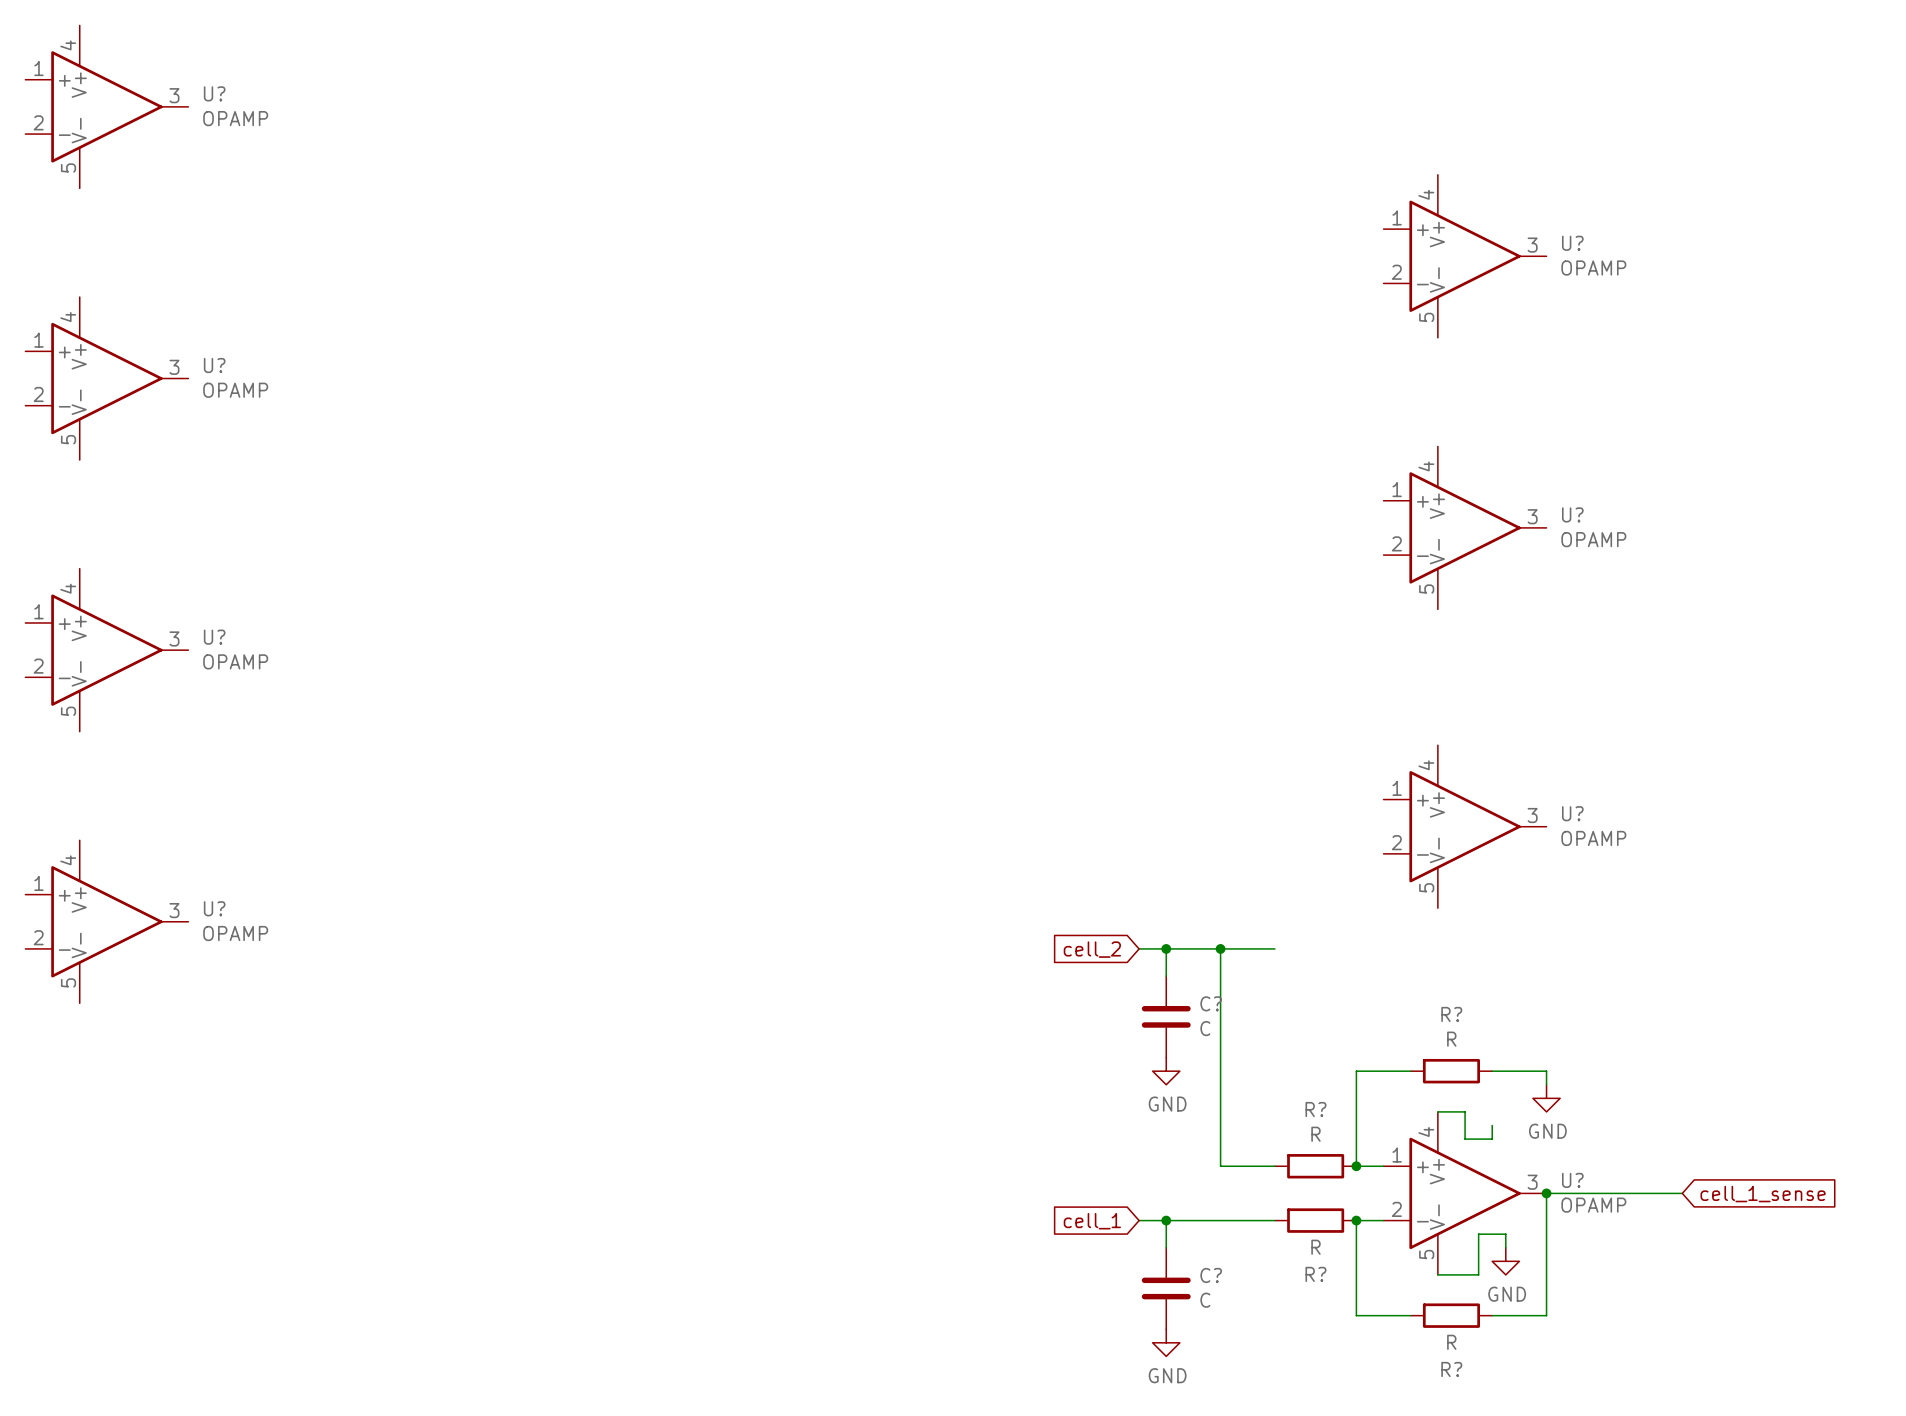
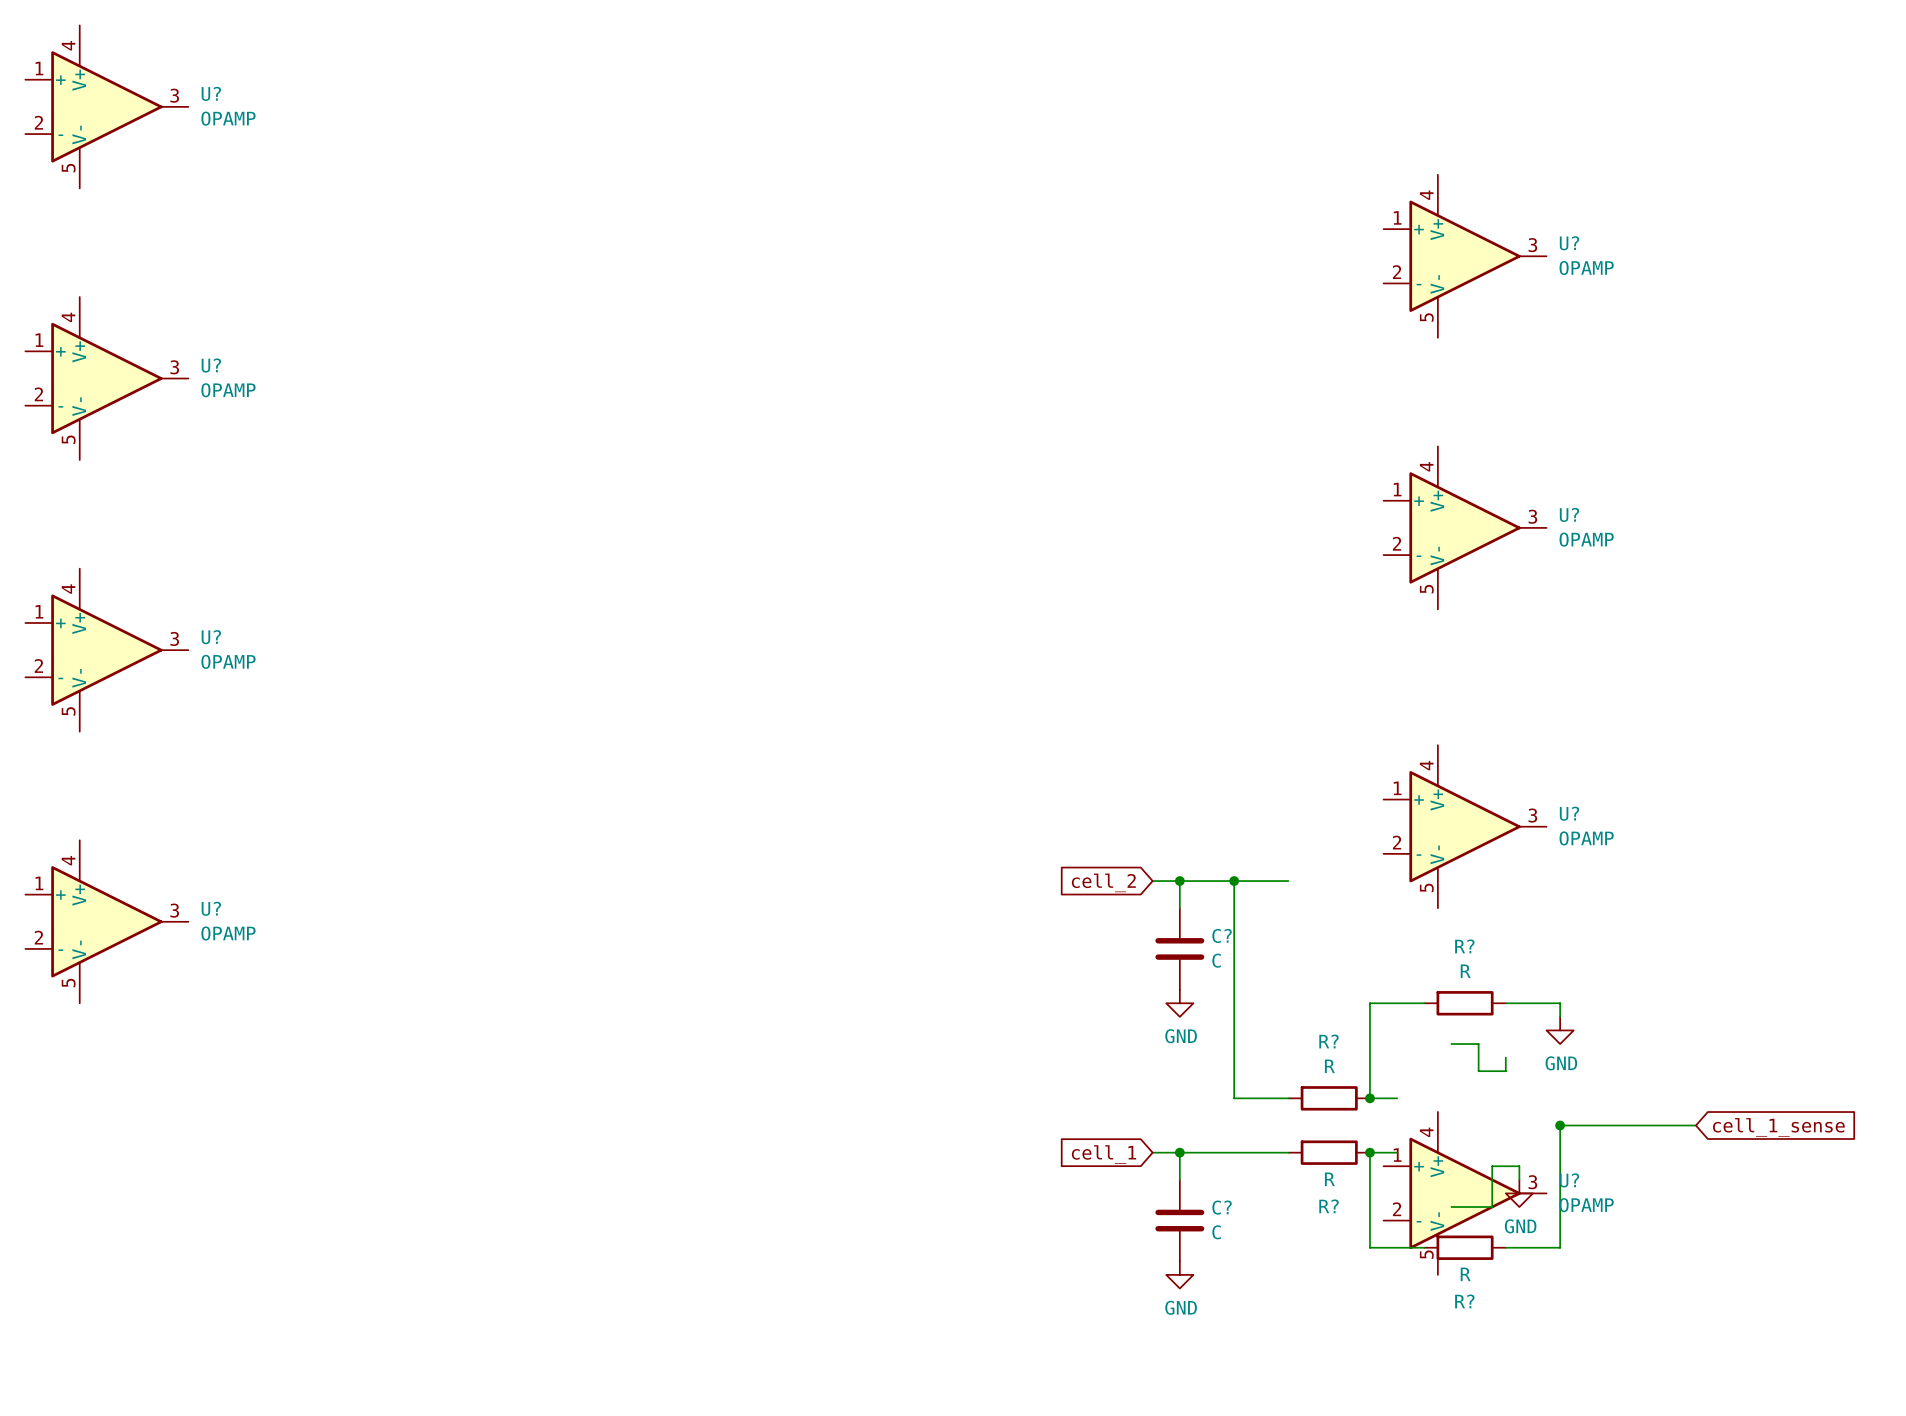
junction: none -> (1179, 881)
junction: none -> (1234, 881)
wire: (1139, 948) (1274, 948) -> (1152, 881) (1288, 881)
wire: (1166, 948) (1166, 976) -> (1179, 881) (1179, 908)
junction: (1166, 948) -> none
wire: (1220, 948) (1220, 1166) (1274, 1166) -> (1234, 881) (1234, 1098) (1288, 1098)
junction: (1220, 948) -> none
global label position: cell_2 (1092, 949) -> cell_2 (1103, 882)
R?: none -> R (1465, 1003)
wire: none -> (1505, 1003) (1560, 1003) (1560, 1016)
C? position: (1166, 1016) -> (1179, 948)
power symbol: none -> GND (1560, 1030)
wire: none -> (1451, 1044) (1478, 1044) (1478, 1071) (1492, 1071)
power symbol position: GND (1166, 1071) -> GND (1179, 1003)
wire: (1410, 1071) (1356, 1071) (1356, 1166) (1383, 1166) -> (1424, 1003) (1369, 1003) (1369, 1098) (1397, 1098)
R?: R (1451, 1071) -> none
wire: (1505, 1071) (1546, 1071) (1546, 1084) -> (1505, 1071) (1505, 1057)
R?: none -> R (1329, 1098)
junction: none -> (1369, 1098)
power symbol: GND (1546, 1098) -> none
R? name position: R? (1315, 1109) -> R? (1329, 1206)
wire: (1437, 1111) (1465, 1111) (1465, 1139) (1492, 1139) (1492, 1125) -> none
junction: none -> (1560, 1125)
R? value position: R (1315, 1134) -> R (1329, 1179)
junction: none -> (1179, 1152)
R? position: (1315, 1166) -> (1329, 1152)
junction position: (1356, 1166) -> (1369, 1152)
wire: none -> (1519, 1179) (1519, 1166) (1492, 1166) (1492, 1207) (1451, 1207)
power symbol: none -> GND (1519, 1193)
junction: (1546, 1193) -> none
wire: (1682, 1193) (1546, 1193) (1546, 1315) (1492, 1315) -> none
global label position: cell_1_sense (1763, 1194) -> cell_1_sense (1778, 1127)
wire: (1139, 1220) (1274, 1220) -> (1152, 1152) (1288, 1152)
wire: (1166, 1220) (1166, 1247) -> (1179, 1152) (1179, 1179)
junction: (1166, 1220) -> none
R?: R (1315, 1220) -> none
junction: (1356, 1220) -> none
wire: (1383, 1220) (1356, 1220) (1356, 1315) (1410, 1315) -> (1397, 1152) (1369, 1152) (1369, 1247) (1424, 1247)
global label position: cell_1 (1092, 1221) -> cell_1 (1104, 1154)
wire: (1505, 1247) (1505, 1234) (1478, 1234) (1478, 1274) (1437, 1274) -> (1505, 1247) (1560, 1247) (1560, 1125) (1695, 1125)
power symbol: GND (1505, 1261) -> none
C? position: (1166, 1288) -> (1179, 1220)
R? position: (1451, 1315) -> (1465, 1247)
power symbol position: GND (1166, 1342) -> GND (1179, 1274)

